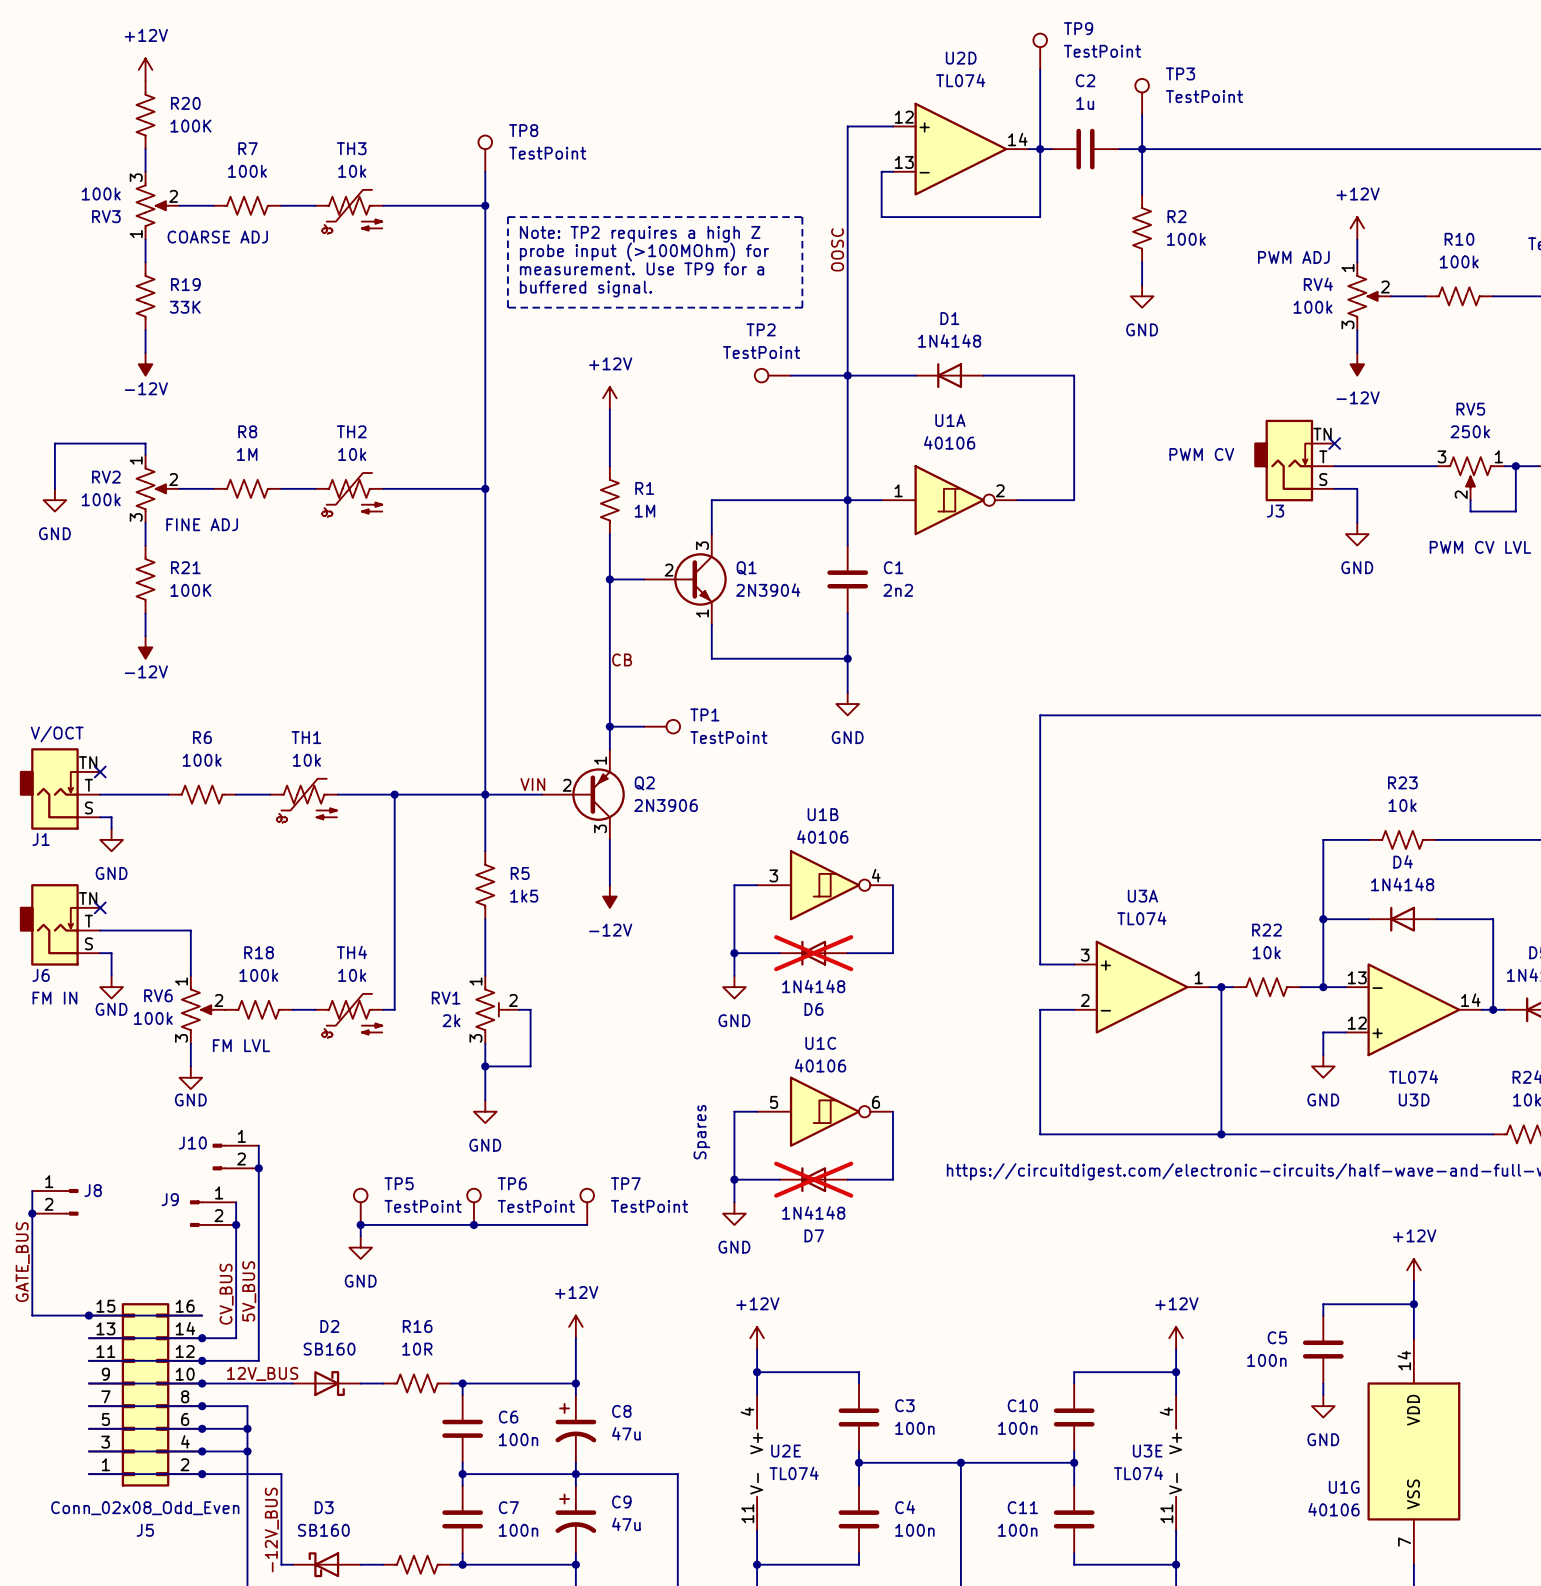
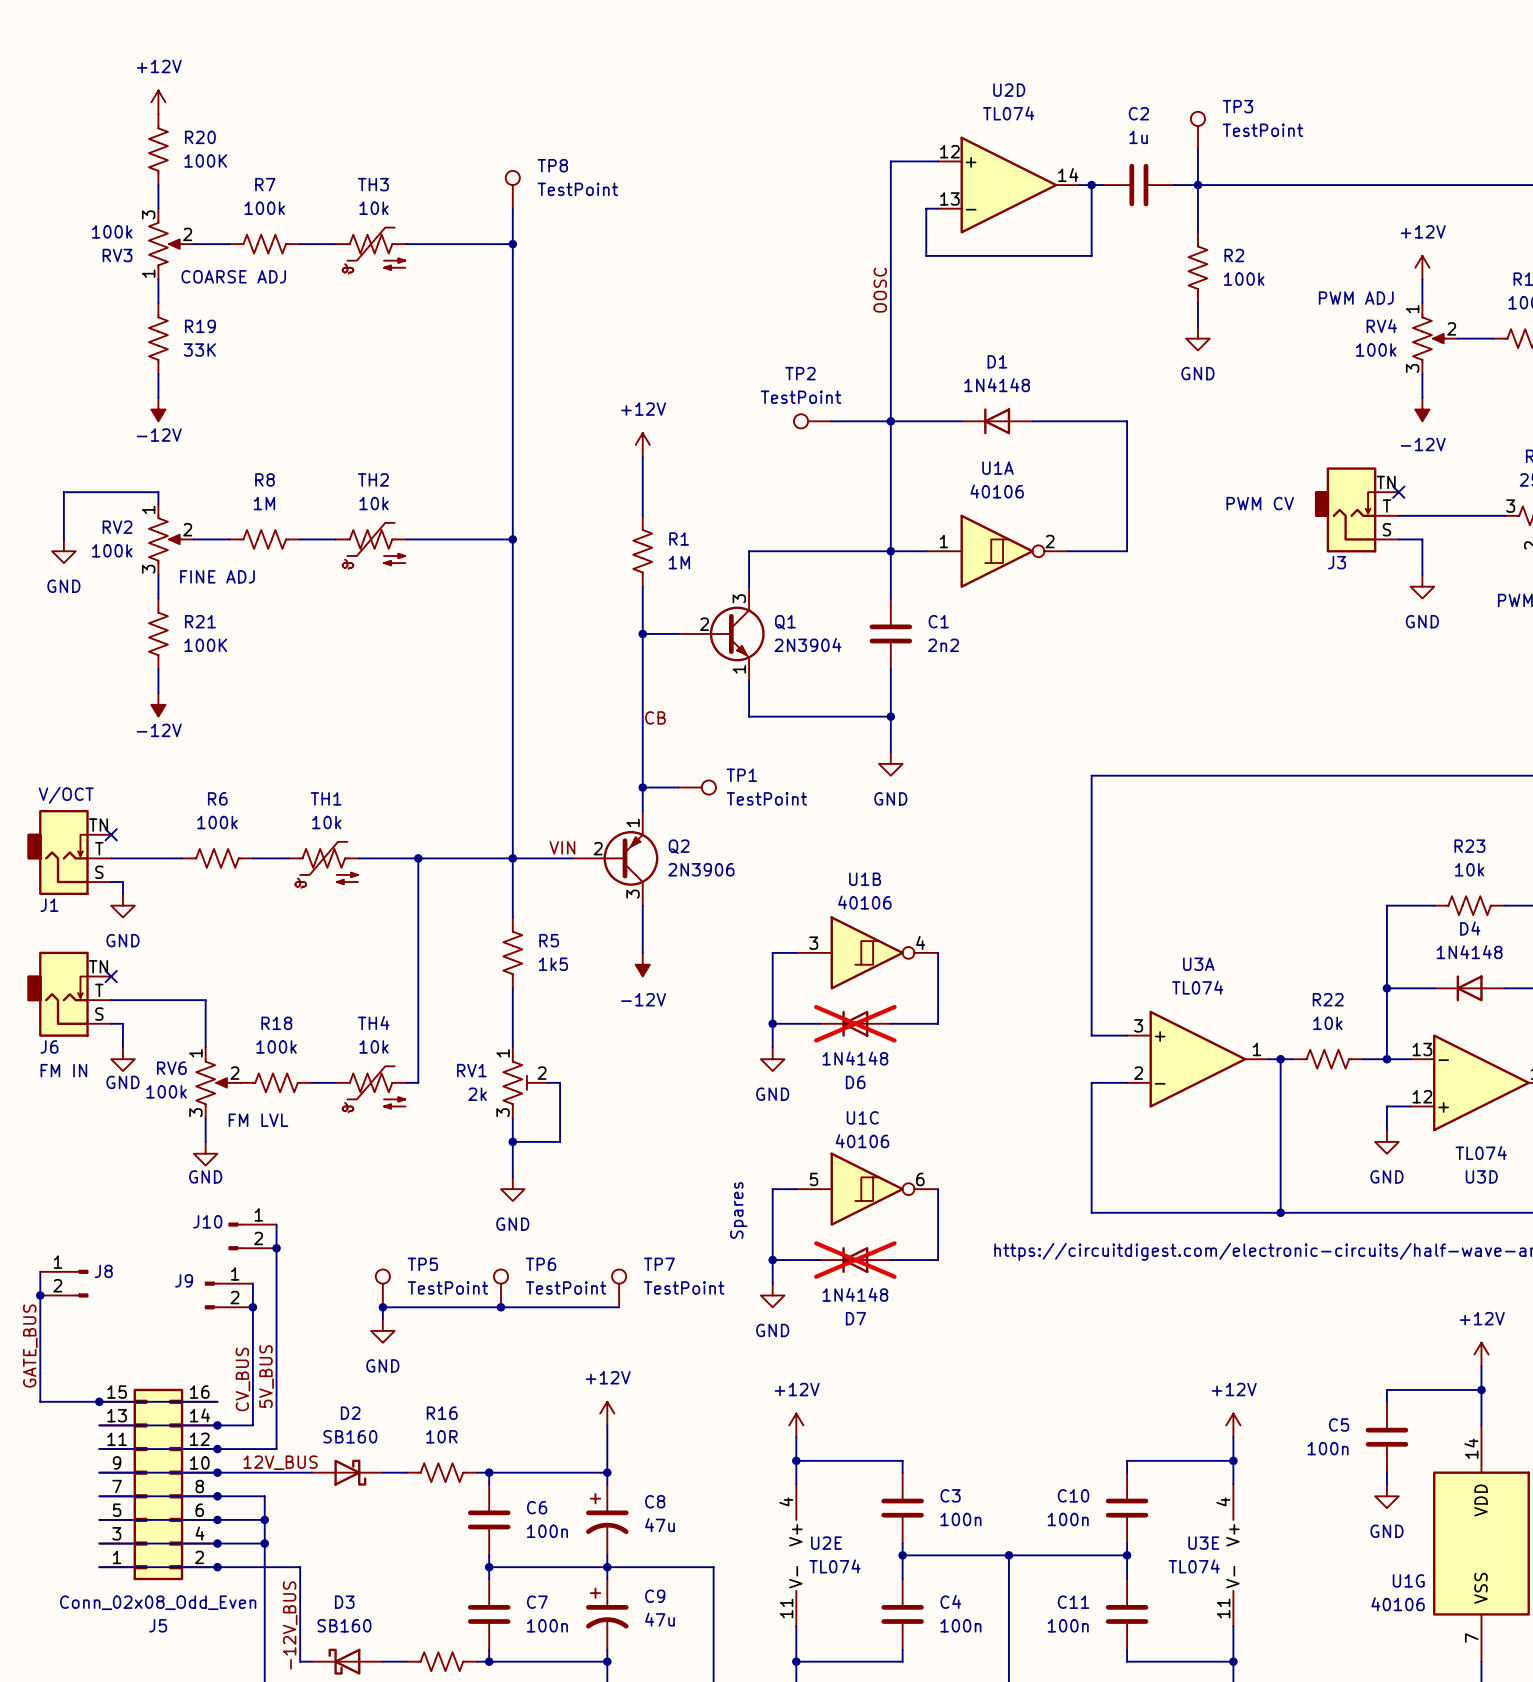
TP9: TestPoint (1040, 51) -> none
wire: (1040, 69) (1040, 149) -> none
line: (507, 217) (802, 217) (802, 307) (507, 307) (507, 217) -> none
text: Note: TP2 requires a high Z (640, 234) -> none
text: probe input (>100MOhm) for (644, 252) -> none
text: measurement. Use TP9 for a (642, 268) -> none
text: buffered signal. (585, 289) -> none

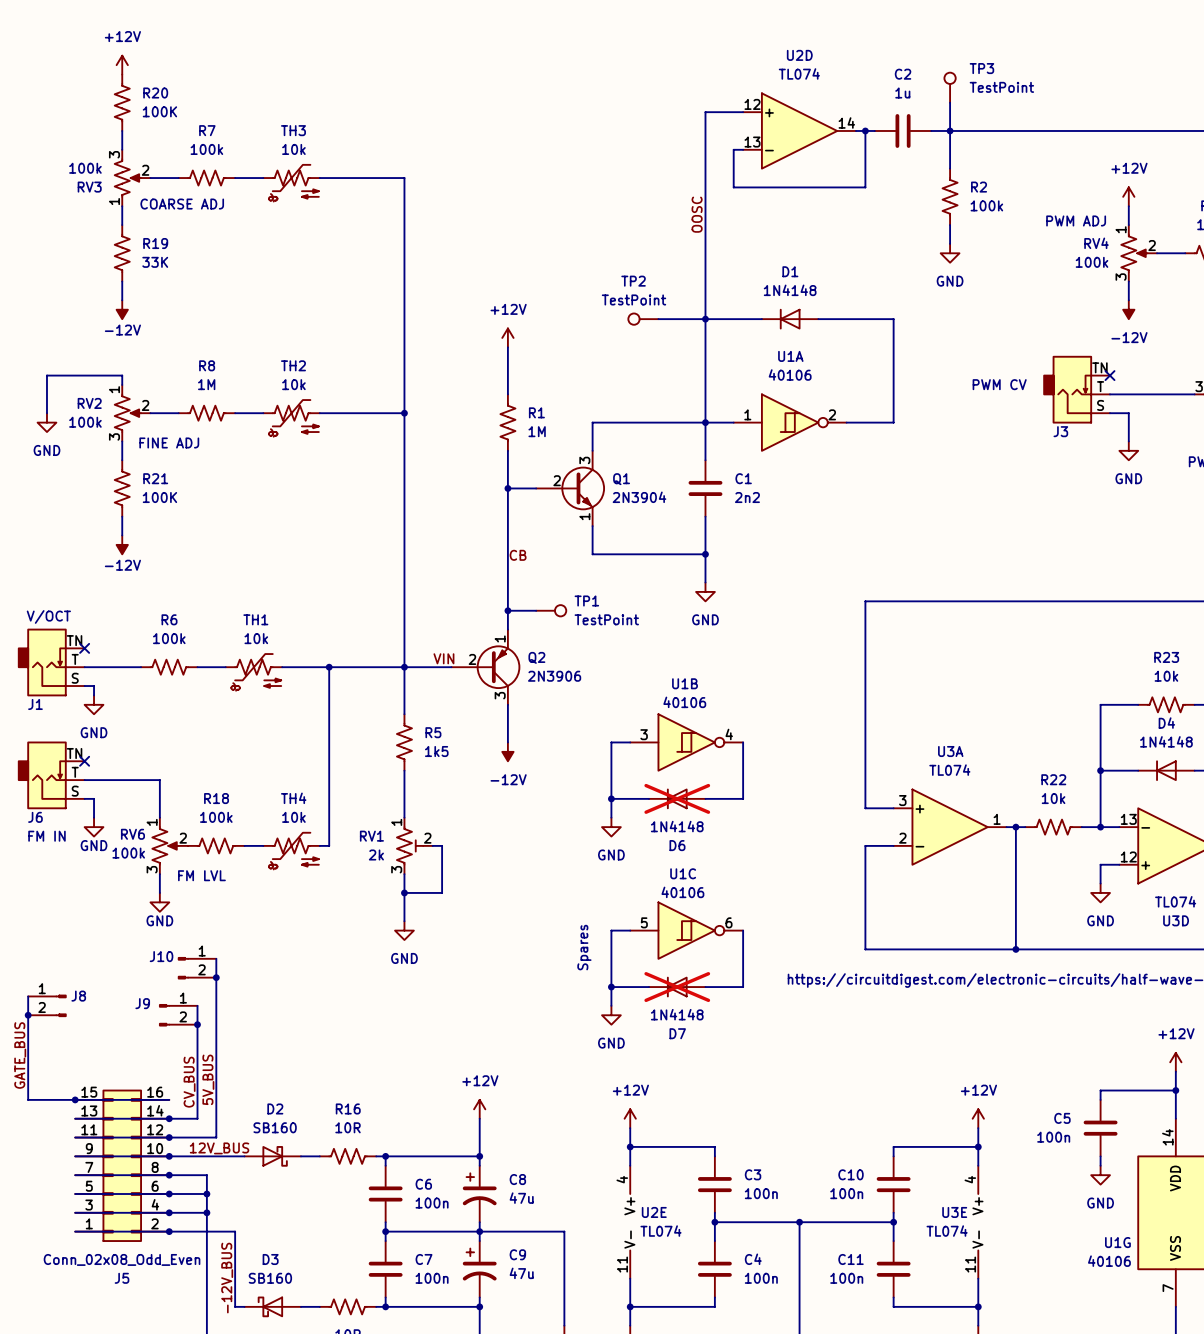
TP8: TestPoint (512, 189) -> none
wire: (512, 208) (512, 244) -> none
junction: (512, 244) -> none
TP5: TestPoint (382, 1288) -> none
TP6: TestPoint (500, 1288) -> none
TP7: TestPoint (619, 1288) -> none
junction: (382, 1307) -> none
junction: (500, 1307) -> none
wire: (619, 1307) (382, 1307) (382, 1319) -> none
power symbol: GND (382, 1330) -> none

